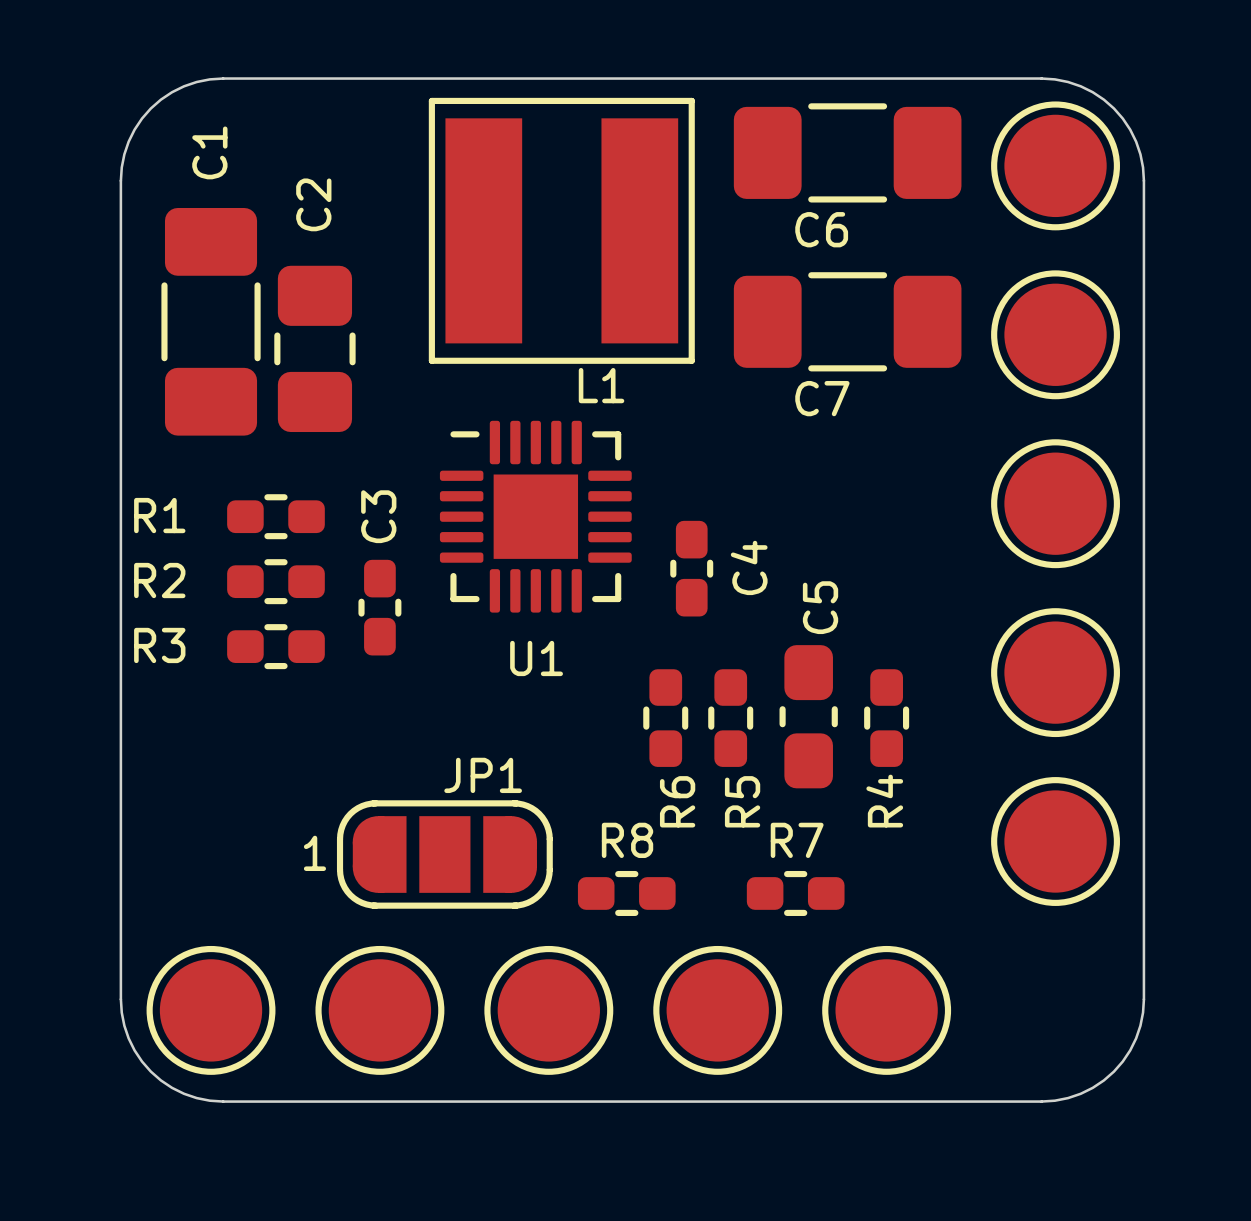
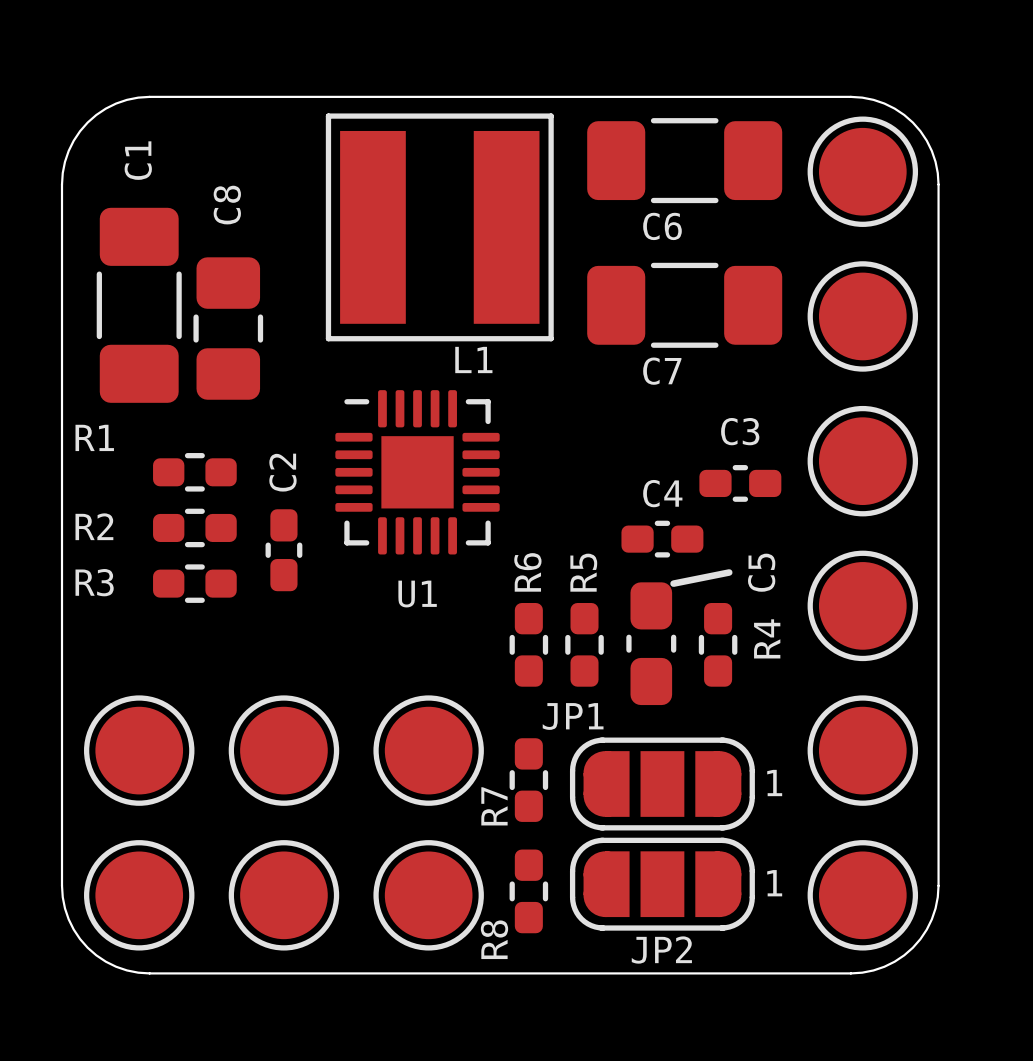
C2 name: C2 (313, 204) -> C8 (227, 205)
R1 name position: R1 (159, 515) -> R1 (94, 437)
C3 name: C3 (378, 516) -> C2 (282, 472)
C3: none -> (740, 483)
C4 rotation: 0° (691, 568) -> 90° clockwise (662, 539)
C4 position: (691, 568) -> (662, 539)
C5 name position: C5 (820, 607) -> C5 (761, 572)
line: none -> (729, 572) (673, 583)
JP1 name position: JP1 (483, 775) -> JP1 (573, 716)
R6 name position: R6 (677, 801) -> R6 (527, 572)
R5 name position: R5 (742, 801) -> R5 (583, 572)
R4 name position: R4 (884, 801) -> R4 (767, 638)
R8 name position: R8 (627, 840) -> R8 (494, 939)
part: none -> (139, 750)
part: none -> (283, 750)
part: none -> (428, 750)
JP1 rotation: 0° (444, 854) -> 180° (662, 784)
JP1 position: (444, 854) -> (662, 784)
R8 rotation: 0° (626, 893) -> 90° clockwise (528, 891)
R8 position: (626, 893) -> (528, 891)
R7 rotation: 0° (795, 893) -> 90° clockwise (528, 780)
R7 position: (795, 893) -> (528, 780)
JP2: none -> (662, 884)
part: (717, 1010) -> none
part: (886, 1010) -> none
part: none -> (862, 895)

